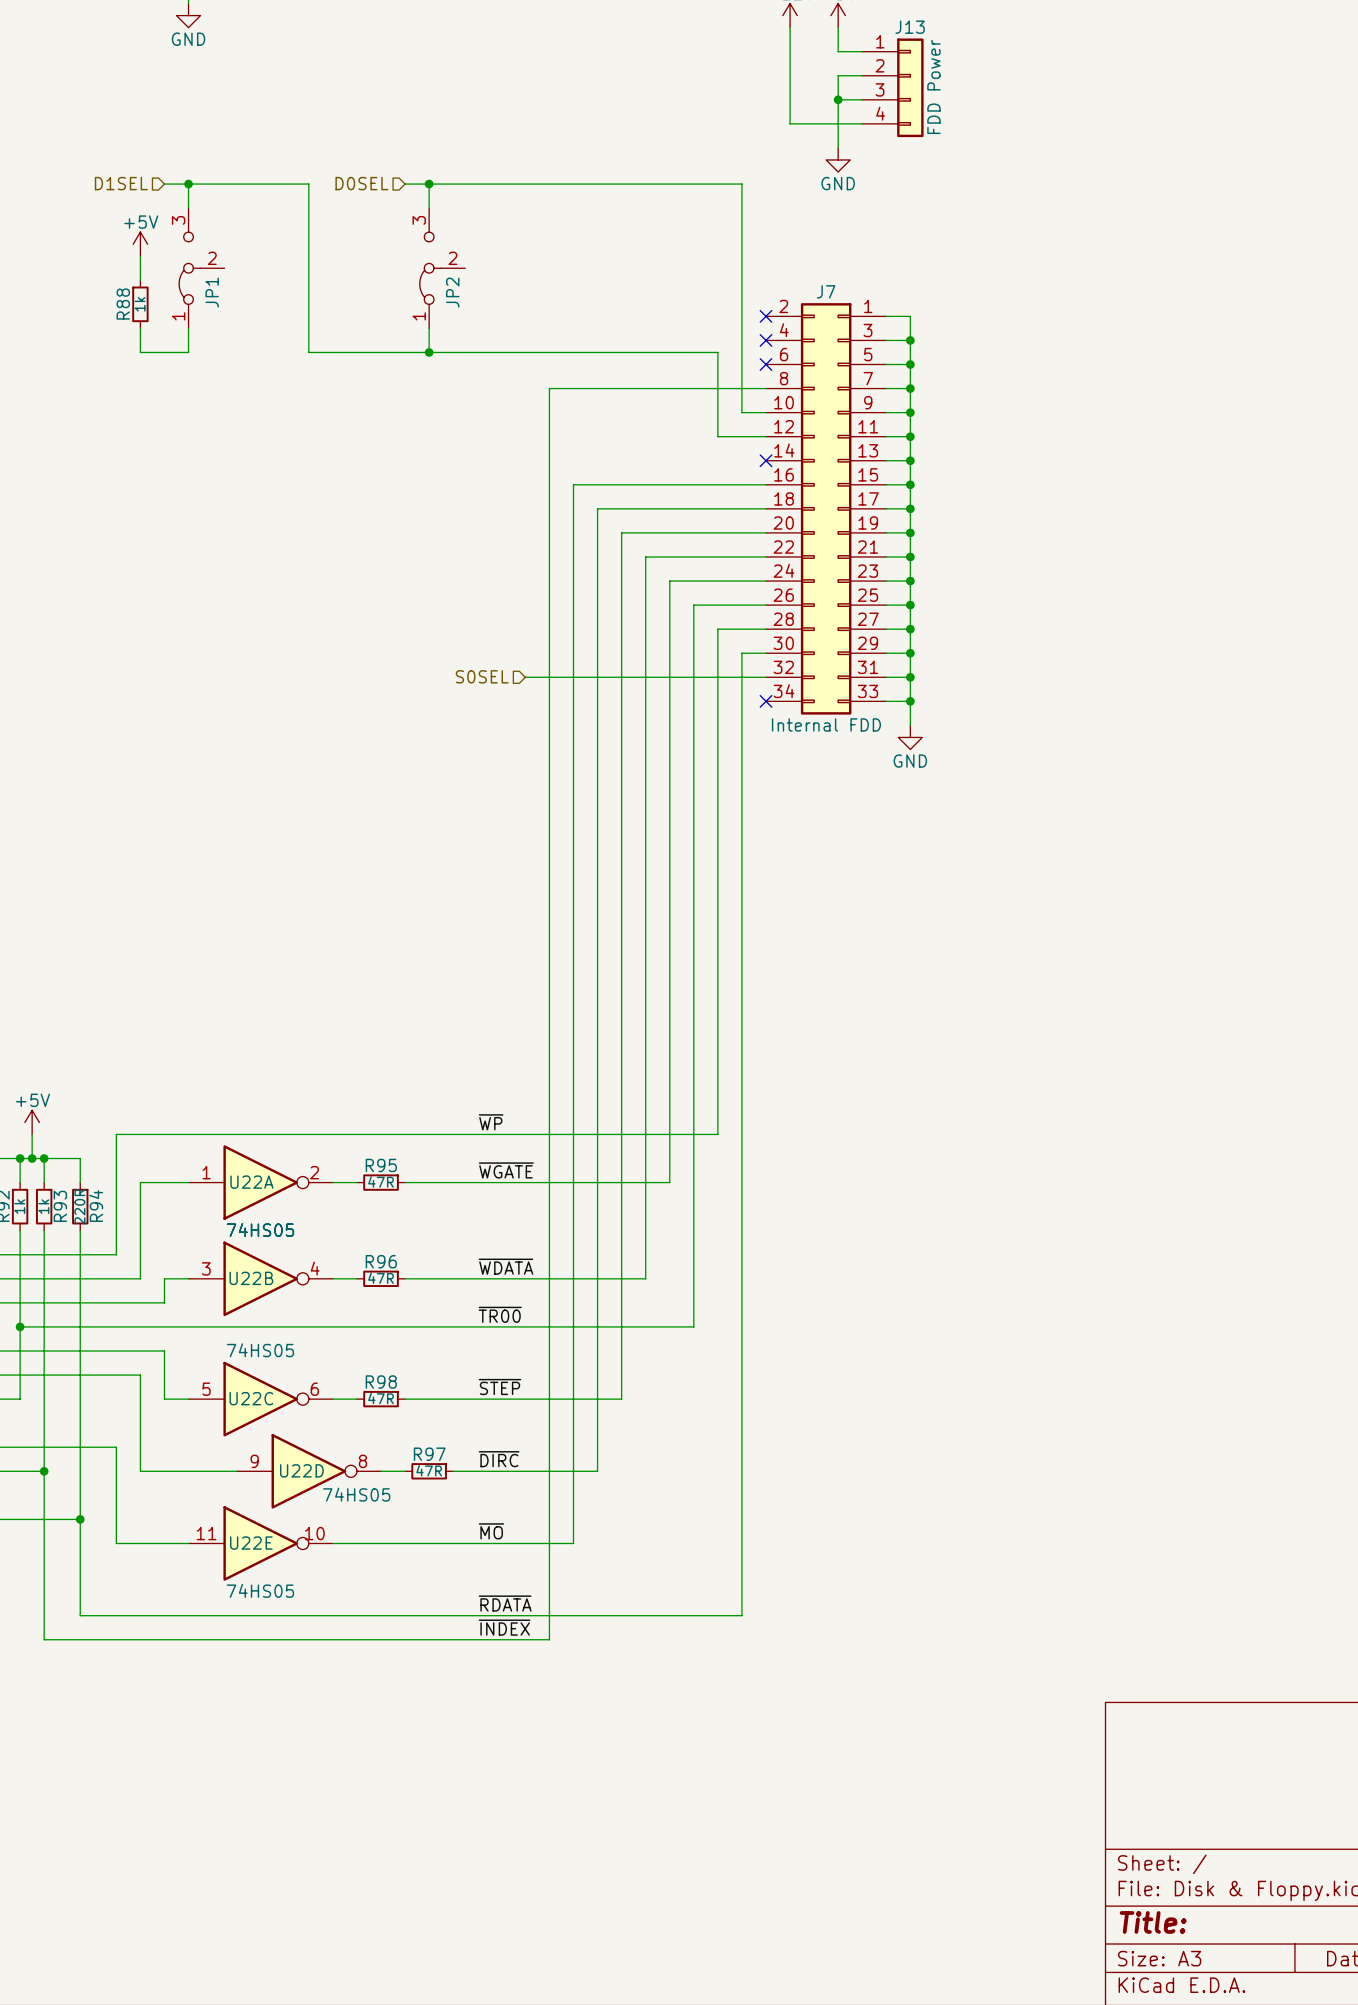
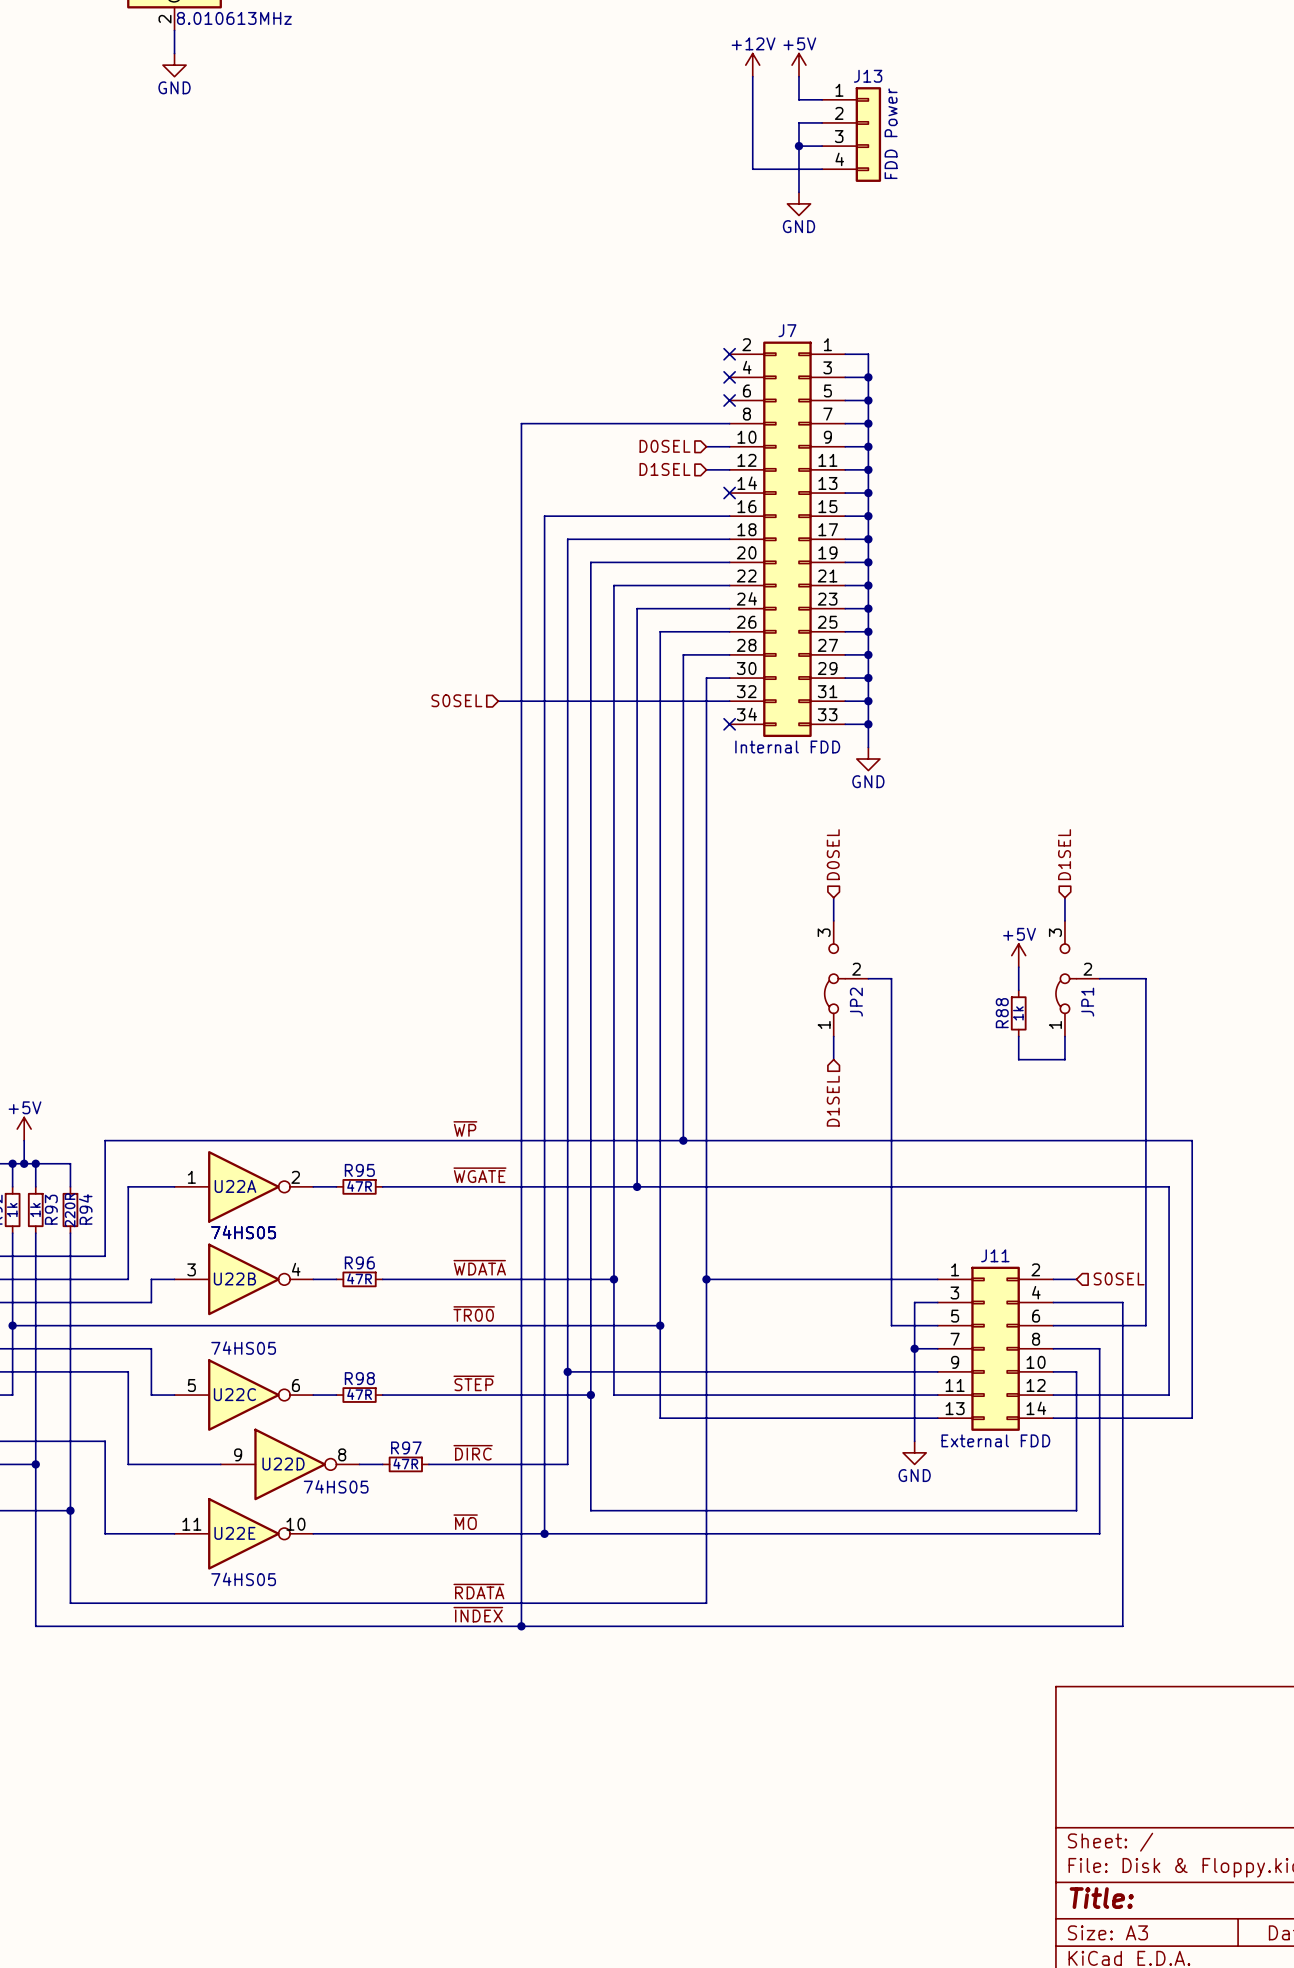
hierarchical label: D1SEL (121, 183) -> none
hierarchical label: D0SEL (361, 183) -> none
wire: (164, 184) (308, 184) (308, 352) (717, 352) (717, 436) (741, 436) -> none
wire: (188, 184) (188, 208) -> none
junction: (188, 184) -> none
wire: (405, 184) (741, 184) (741, 412) -> none
wire: (429, 184) (429, 208) -> none
junction: (429, 184) -> none
power symbol: +5V (140, 244) -> none
wire: (140, 256) (140, 280) -> none
JP1 position: (201, 268) -> (1077, 978)
JP2 position: (442, 268) -> (846, 978)
R88 position: (140, 304) -> (1018, 1013)
wire: (140, 328) (140, 352) (188, 352) (188, 328) -> none
wire: (429, 328) (429, 352) -> none
junction: (429, 352) -> none
hierarchical label: none -> D0SEL (665, 446)
hierarchical label: none -> D1SEL (665, 469)
hierarchical label: none -> D0SEL (833, 854)
hierarchical label: none -> D1SEL (1064, 854)
wire: none -> (833, 897) (833, 920)
wire: none -> (1064, 897) (1064, 920)
power symbol: none -> +5V (1018, 955)
wire: none -> (1018, 967) (1018, 990)
wire: none -> (868, 978) (891, 978) (891, 1325) (937, 1325)
wire: none -> (1099, 978) (1145, 978) (1145, 1325) (1053, 1325)
wire: none -> (833, 1036) (833, 1059)
wire: none -> (1018, 1036) (1018, 1059) (1064, 1059) (1064, 1036)
hierarchical label: none -> D1SEL (833, 1101)
wire: none -> (683, 1140) (1192, 1140) (1192, 1418) (1053, 1418)
junction: none -> (683, 1140)
wire: none -> (637, 1186) (1169, 1186) (1169, 1395) (1053, 1395)
junction: none -> (637, 1186)
wire: none -> (613, 1279) (613, 1395) (937, 1395)
junction: none -> (613, 1279)
wire: none -> (706, 1279) (937, 1279)
junction: none -> (706, 1279)
wire: none -> (1053, 1279) (1076, 1279)
hierarchical label: none -> S0SEL (1119, 1278)
wire: none -> (937, 1302) (914, 1302) (914, 1441)
wire: none -> (1053, 1302) (1122, 1302) (1122, 1626) (521, 1626)
wire: none -> (660, 1325) (660, 1418) (937, 1418)
junction: none -> (660, 1325)
wire: none -> (914, 1348) (937, 1348)
junction: none -> (914, 1348)
J11: none -> External FDD (995, 1348)
wire: none -> (1053, 1348) (1099, 1348) (1099, 1533) (544, 1533)
wire: none -> (567, 1371) (937, 1371)
junction: none -> (567, 1371)
wire: none -> (1053, 1371) (1076, 1371) (1076, 1510) (590, 1510) (590, 1395)
junction: none -> (590, 1395)
power symbol: none -> GND (914, 1452)
junction: none -> (544, 1533)
junction: none -> (521, 1626)

